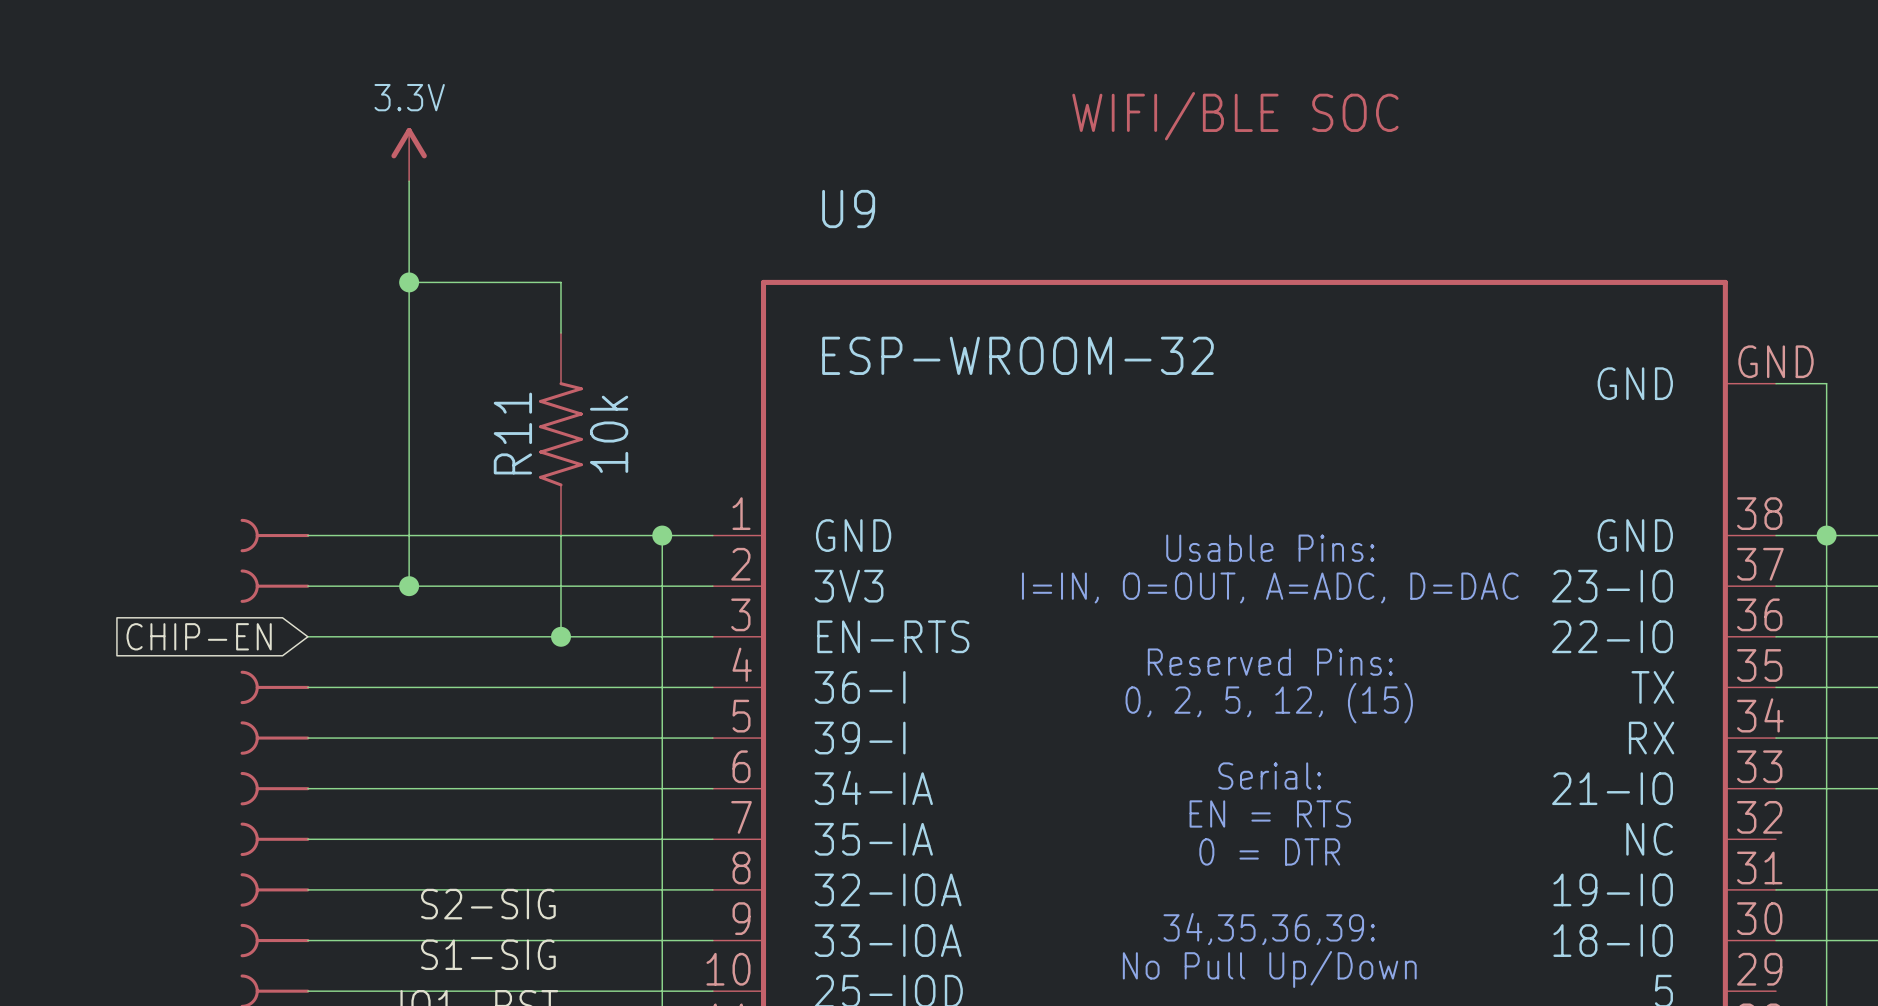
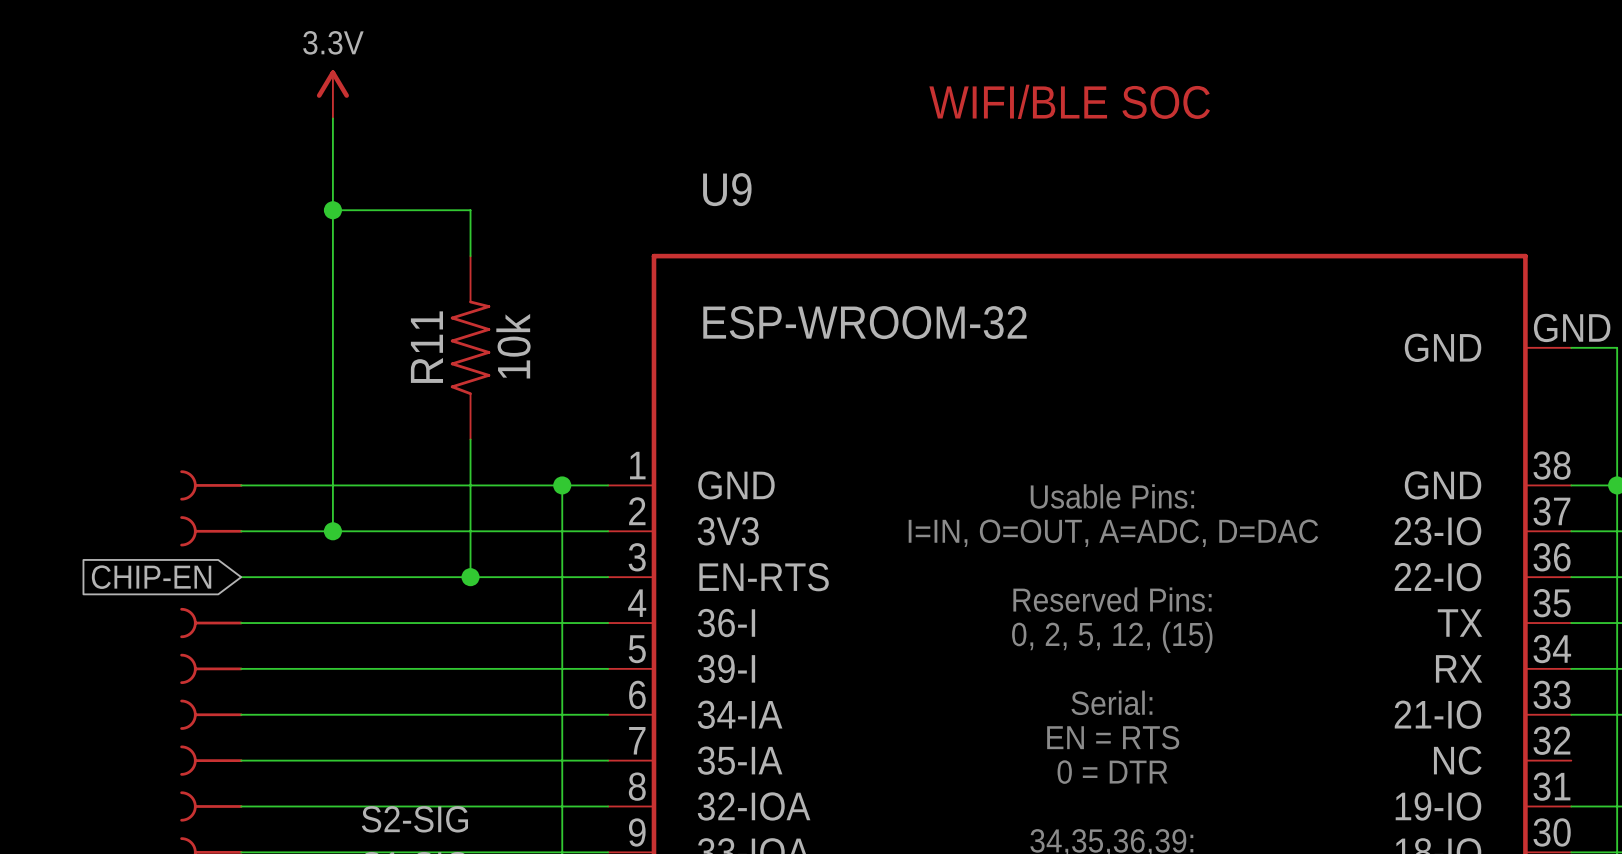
power symbol position: 3.3V (409, 154) -> 3.3V (332, 94)
wire: (409, 282) (561, 282) (561, 333) -> (332, 210) (470, 210) (470, 256)
junction position: (409, 282) -> (332, 210)
R11 position: (561, 434) -> (470, 347)

